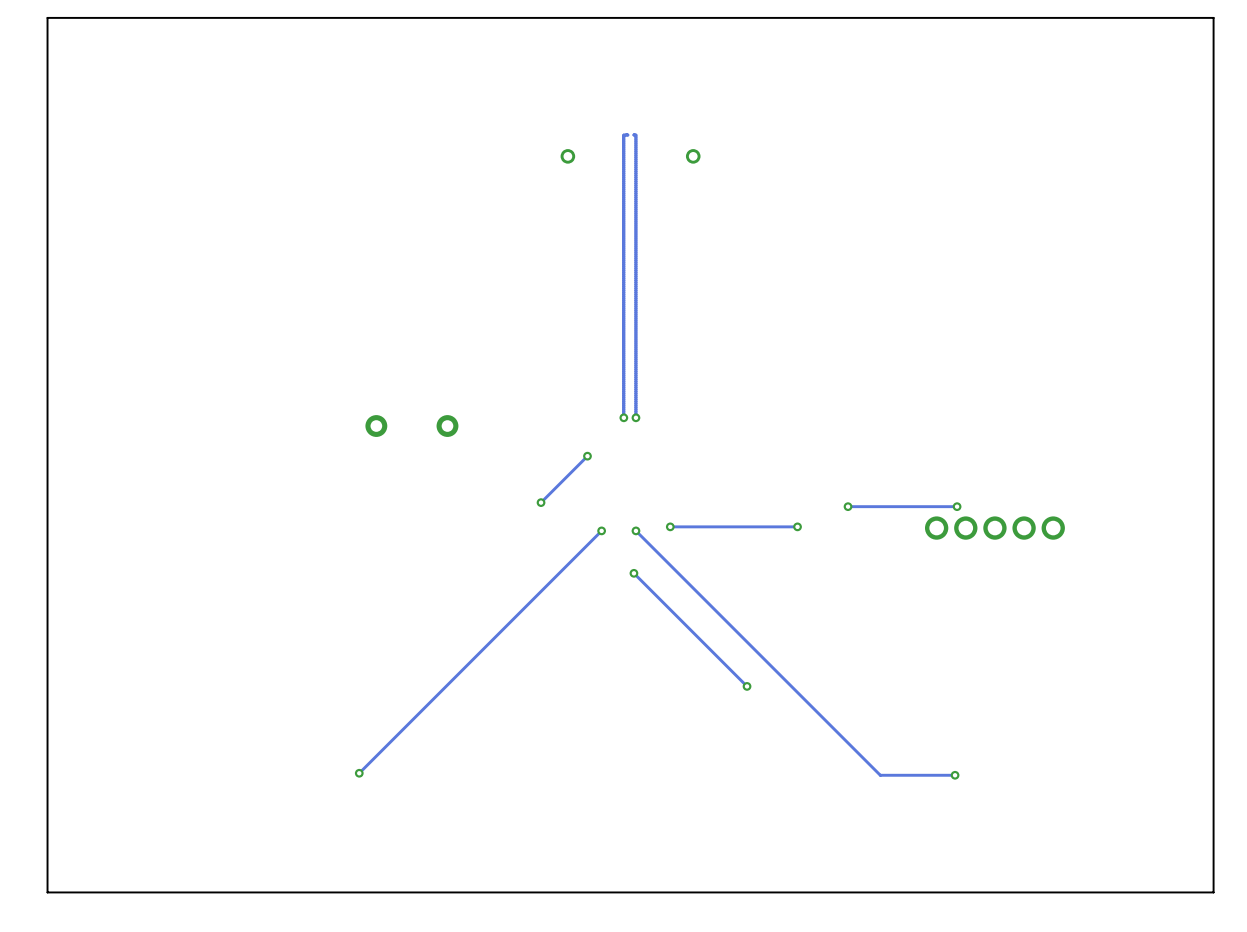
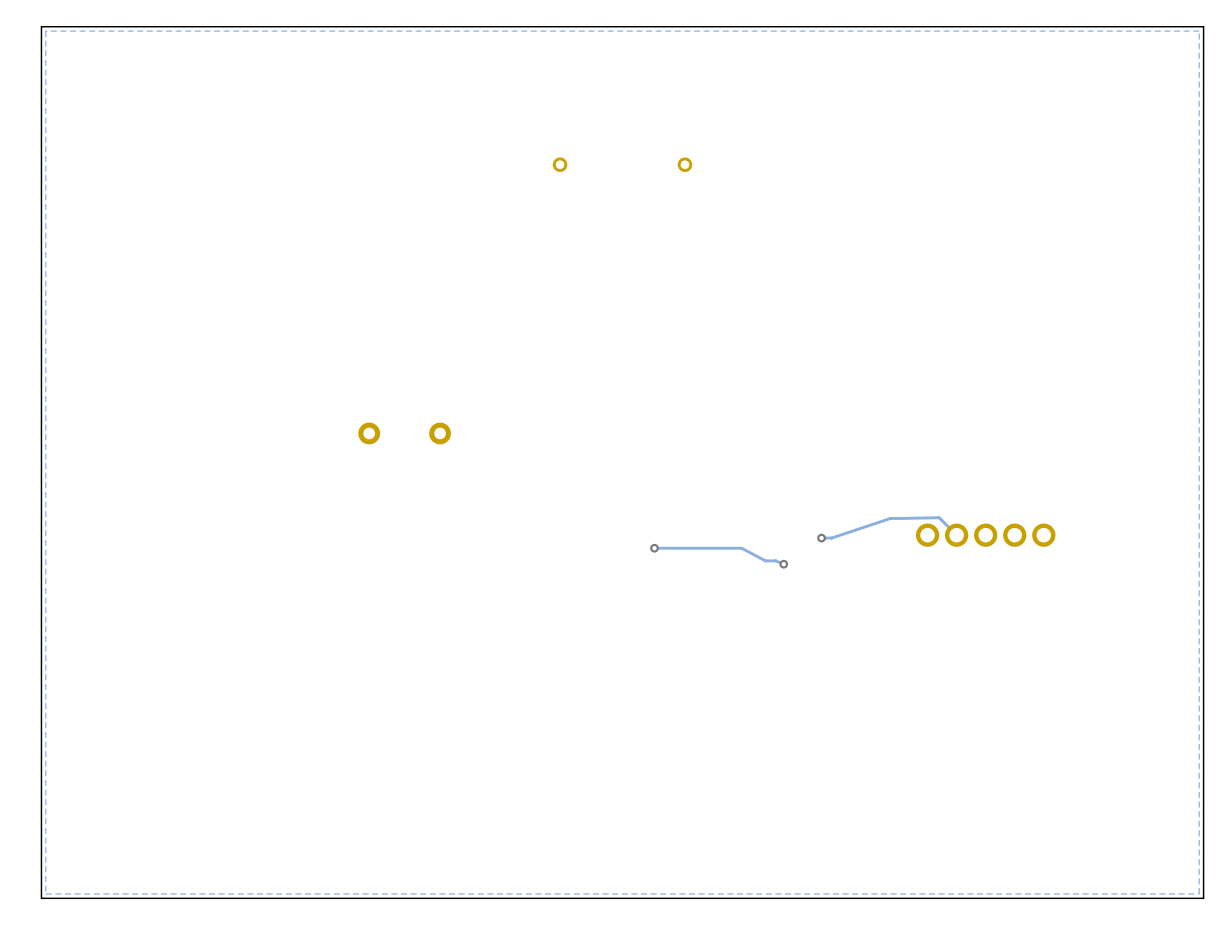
zone outline: none -> (1199, 31) (45, 31) (45, 893) (1199, 893) (1199, 31)
track: (626, 134) (623, 135) (623, 417) -> none
track: (634, 134) (635, 135) (635, 417) -> none
via: (623, 417) -> none
via: (635, 417) -> none
track: (587, 456) (541, 502) -> none
via: (587, 456) -> none
via: (541, 502) -> none
via: (848, 506) -> none
track: (957, 506) (848, 506) -> none
via: (957, 506) -> none
via: (670, 526) -> none
track: (797, 526) (670, 526) -> none
via: (797, 526) -> none
track: none -> (956, 535) (939, 517) (890, 518) (831, 538) (821, 538)
track: (601, 530) (359, 773) -> none
via: (601, 530) -> none
track: (635, 530) (880, 775) (955, 775) -> none
via: (635, 530) -> none
via: none -> (821, 538)
track: none -> (654, 548) (741, 548) (765, 560) (775, 560) (783, 564)
via: none -> (654, 548)
via: none -> (783, 564)
track: (633, 573) (747, 686) -> none
via: (633, 573) -> none
via: (747, 686) -> none
via: (359, 773) -> none
via: (955, 775) -> none

